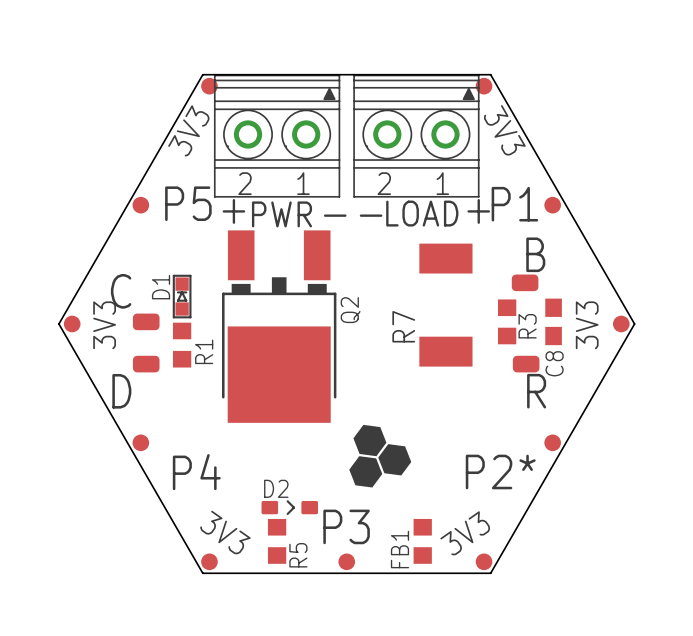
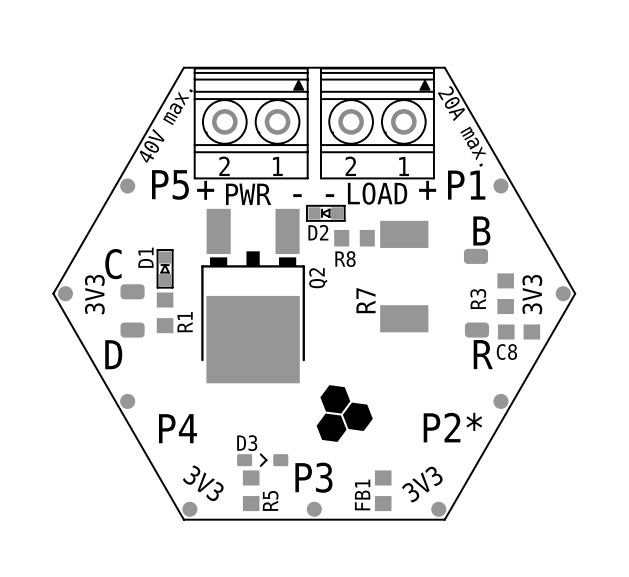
part footprint: [58, 73, 636, 575] -> [52, 66, 577, 521]
text: 3V3 (188, 130) -> none
text: 3V3 (504, 130) -> none
text: none -> 40V max. (166, 125)
text: none -> 20A max. (462, 126)
D2: none -> (325, 213)
R8: none -> (354, 238)
R3 position: (507, 321) -> (505, 293)
C8 rotation: 0° (553, 321) -> 90° clockwise (519, 331)
C8 position: (553, 321) -> (519, 331)
D2 name: D2 (276, 488) -> D3 (247, 443)

